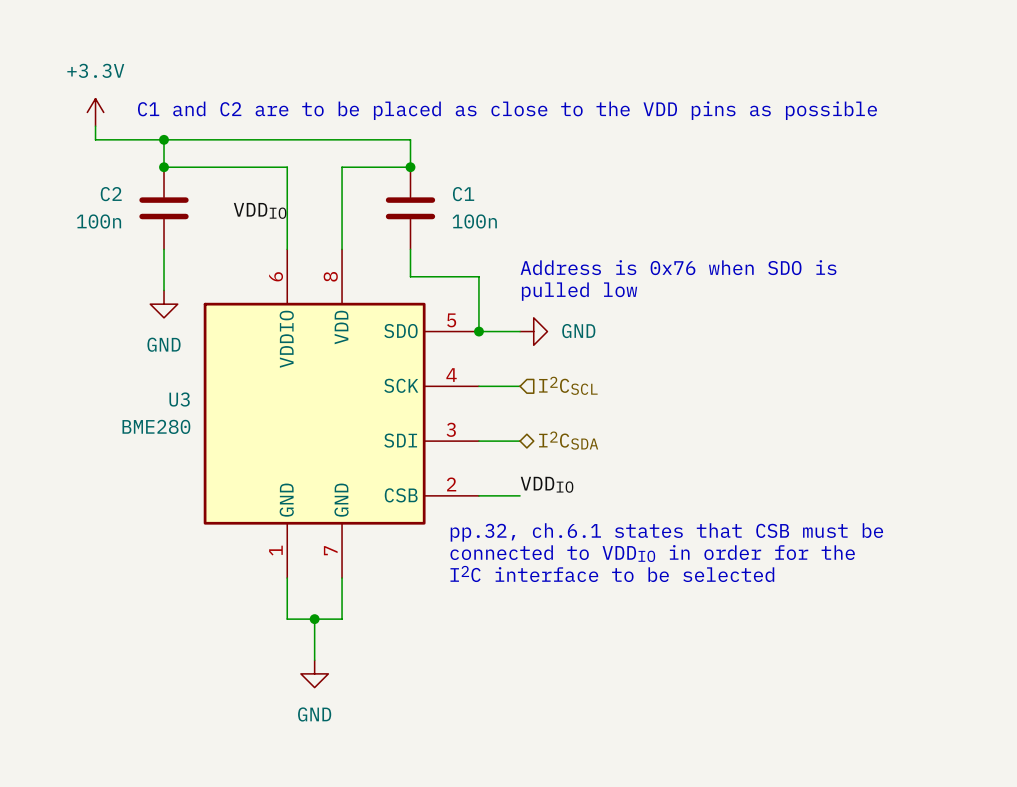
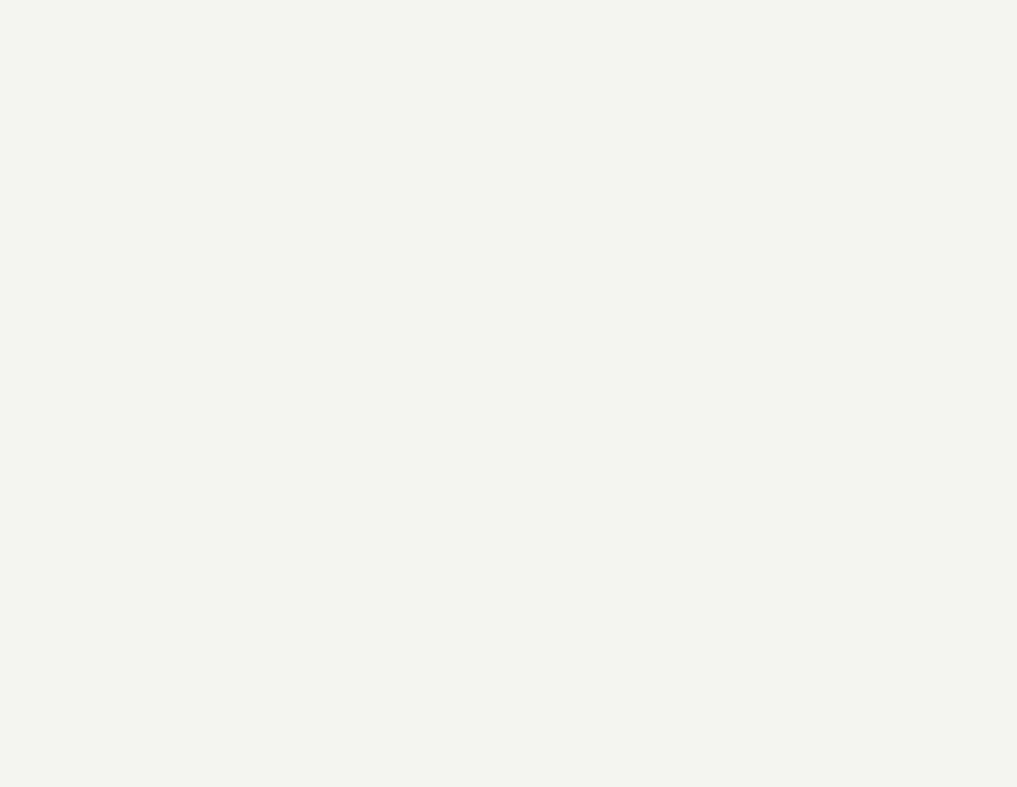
text: C1 and C2 are to be placed as close to the VDD pins as possible (507, 110) -> none
power symbol: +3.3V (95, 112) -> none
wire: (95, 126) (95, 139) (410, 139) (410, 167) (342, 167) (342, 249) -> none
wire: (164, 139) (164, 167) (287, 167) (287, 249) -> none
junction: (164, 139) -> none
junction: (164, 167) -> none
junction: (410, 167) -> none
C2: 100n (164, 208) -> none
C1: 100n (410, 208) -> none
label: VDDIO (260, 210) -> none
wire: (164, 249) (164, 290) -> none
wire: (410, 249) (410, 276) (478, 276) (478, 331) (520, 331) -> none
text: Address is 0x76 when SDO is (678, 267) -> none
text: pulled low (579, 291) -> none
power symbol: GND (164, 304) -> none
junction: (478, 331) -> none
power symbol: GND (533, 331) -> none
hierarchical label: I2CSCL (568, 385) -> none
wire: (478, 386) (520, 386) -> none
U3: BME280 (341, 413) -> none
hierarchical label: I2CSDA (568, 440) -> none
wire: (478, 441) (520, 441) -> none
label: VDDIO (547, 484) -> none
wire: (478, 495) (520, 495) -> none
text: pp.32, ch.6.1 states that CSB must be (666, 532) -> none
text: connected to VDDIO in order for the (652, 553) -> none
text: I2C interface to be selected (612, 573) -> none
wire: (287, 578) (287, 619) (342, 619) (342, 578) -> none
wire: (314, 619) (314, 660) -> none
junction: (314, 619) -> none
power symbol: GND (314, 673) -> none

